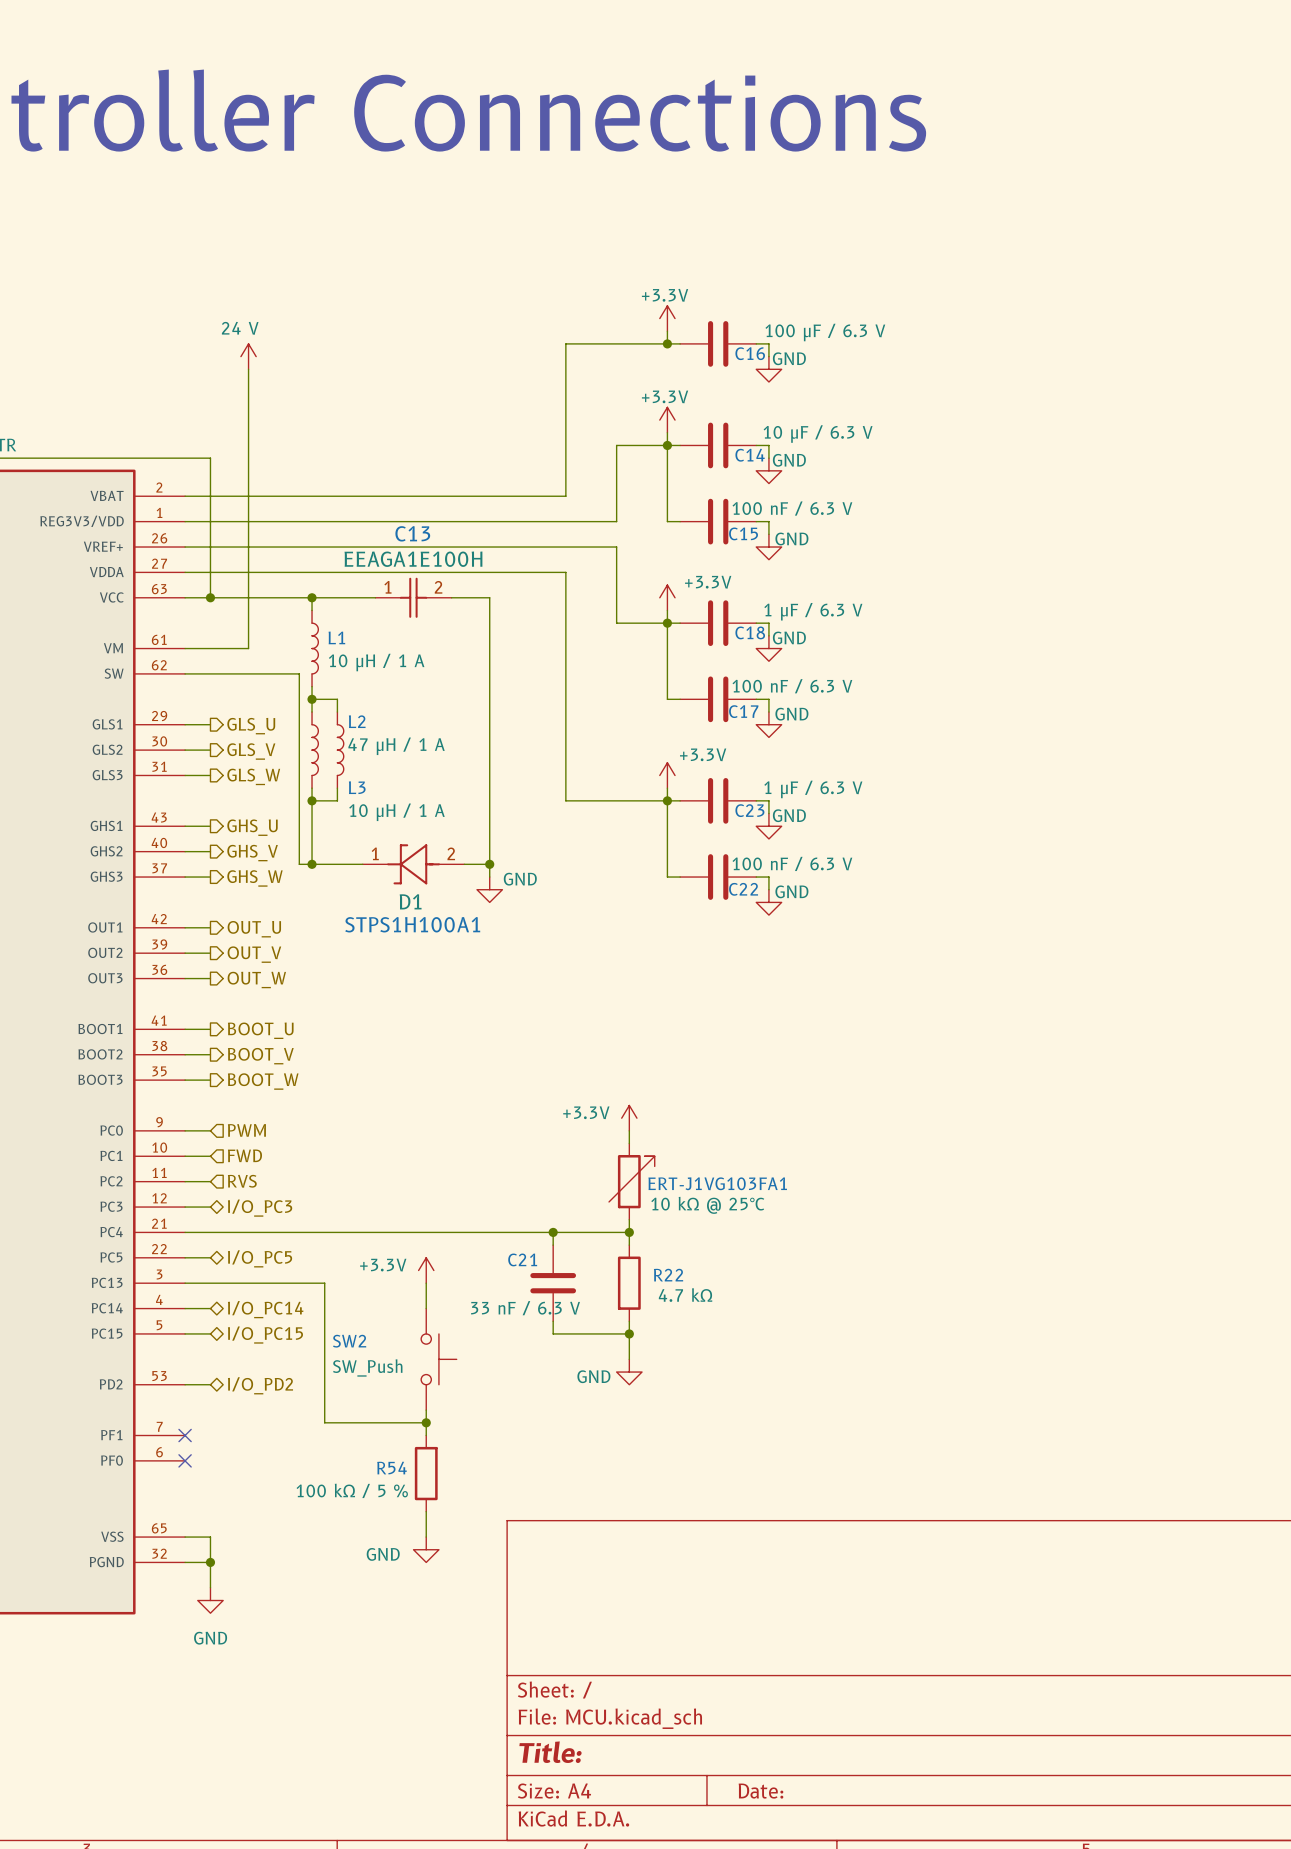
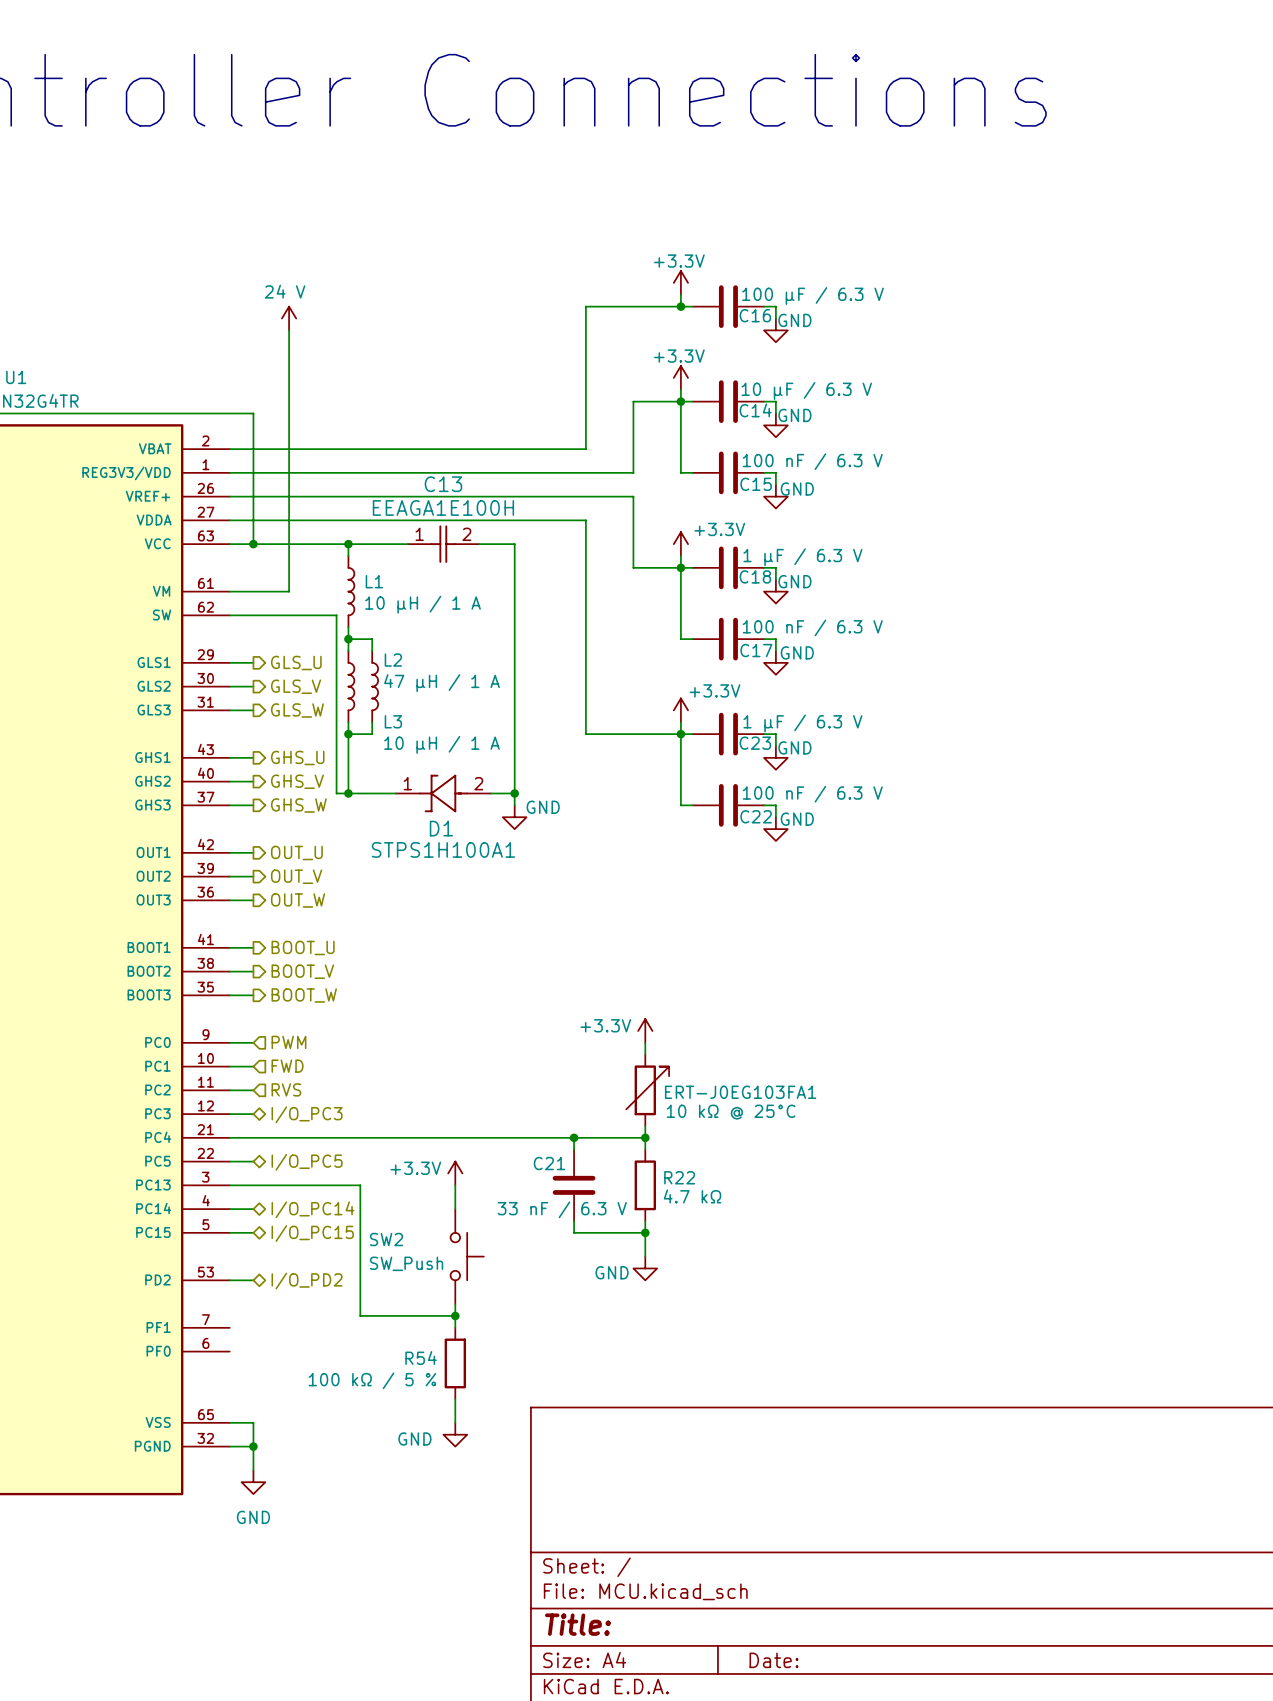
ERT-J1VG103FA1 name: ERT-J1VG103FA1 (717, 1183) -> ERT-J0EG103FA1 (740, 1092)
no-connect mark: (185, 1435) -> none
no-connect mark: (185, 1460) -> none

